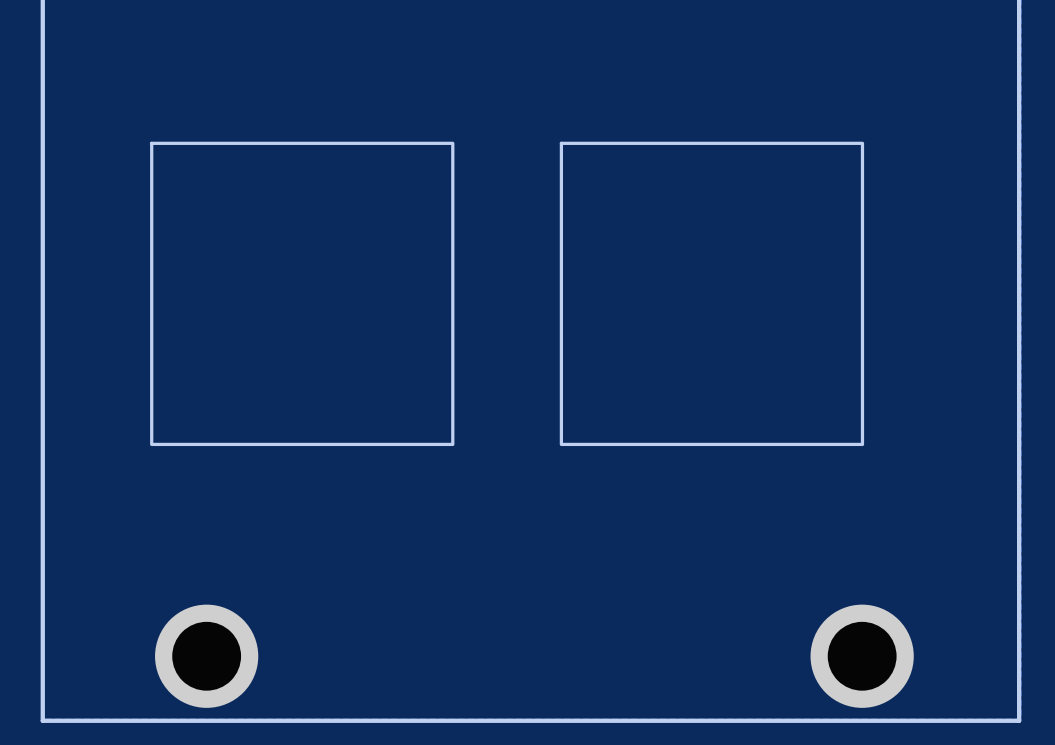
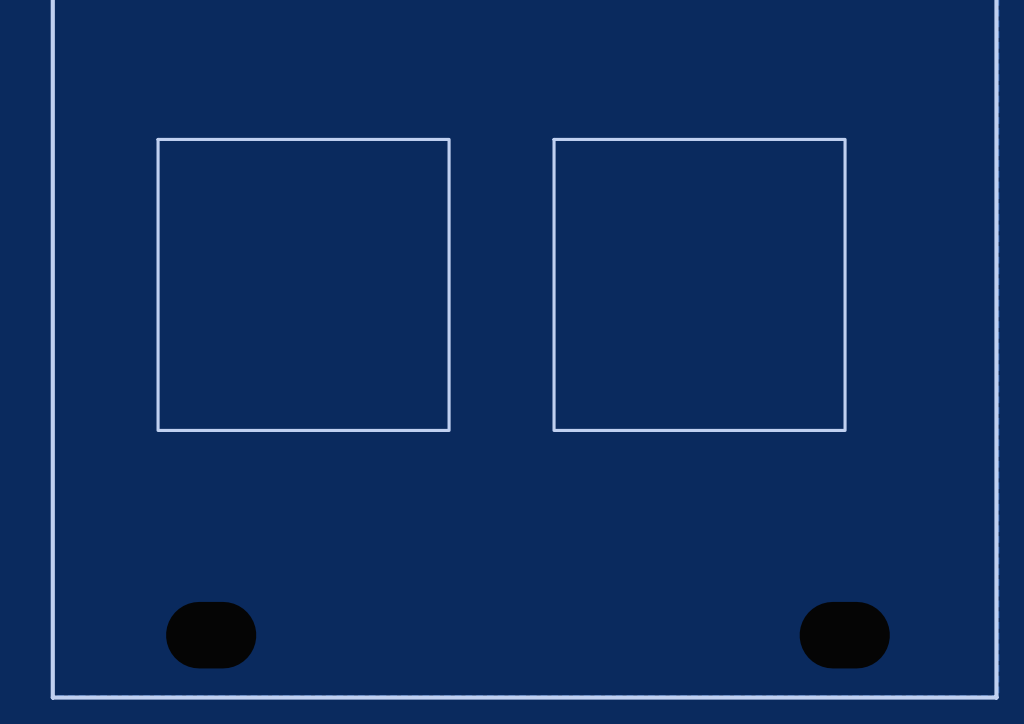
part footprint: [155, 604, 259, 708] -> [166, 601, 257, 669]
part footprint: [810, 604, 914, 708] -> [799, 601, 890, 669]

